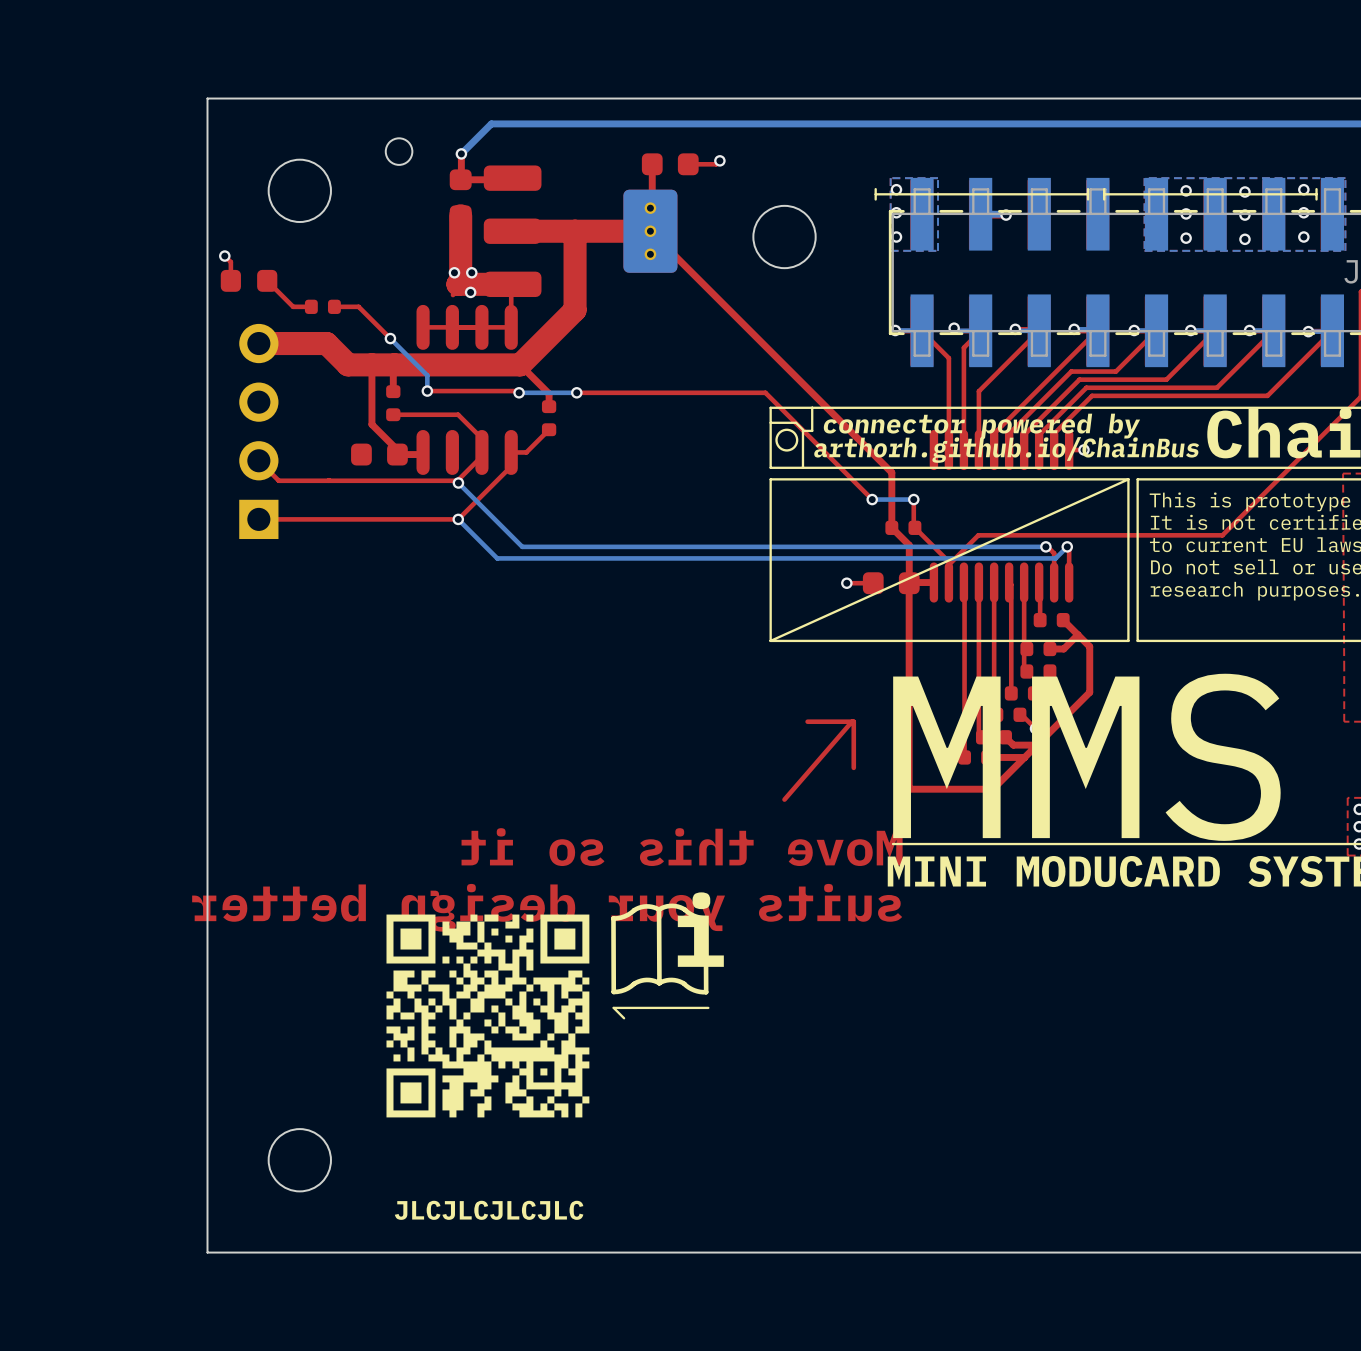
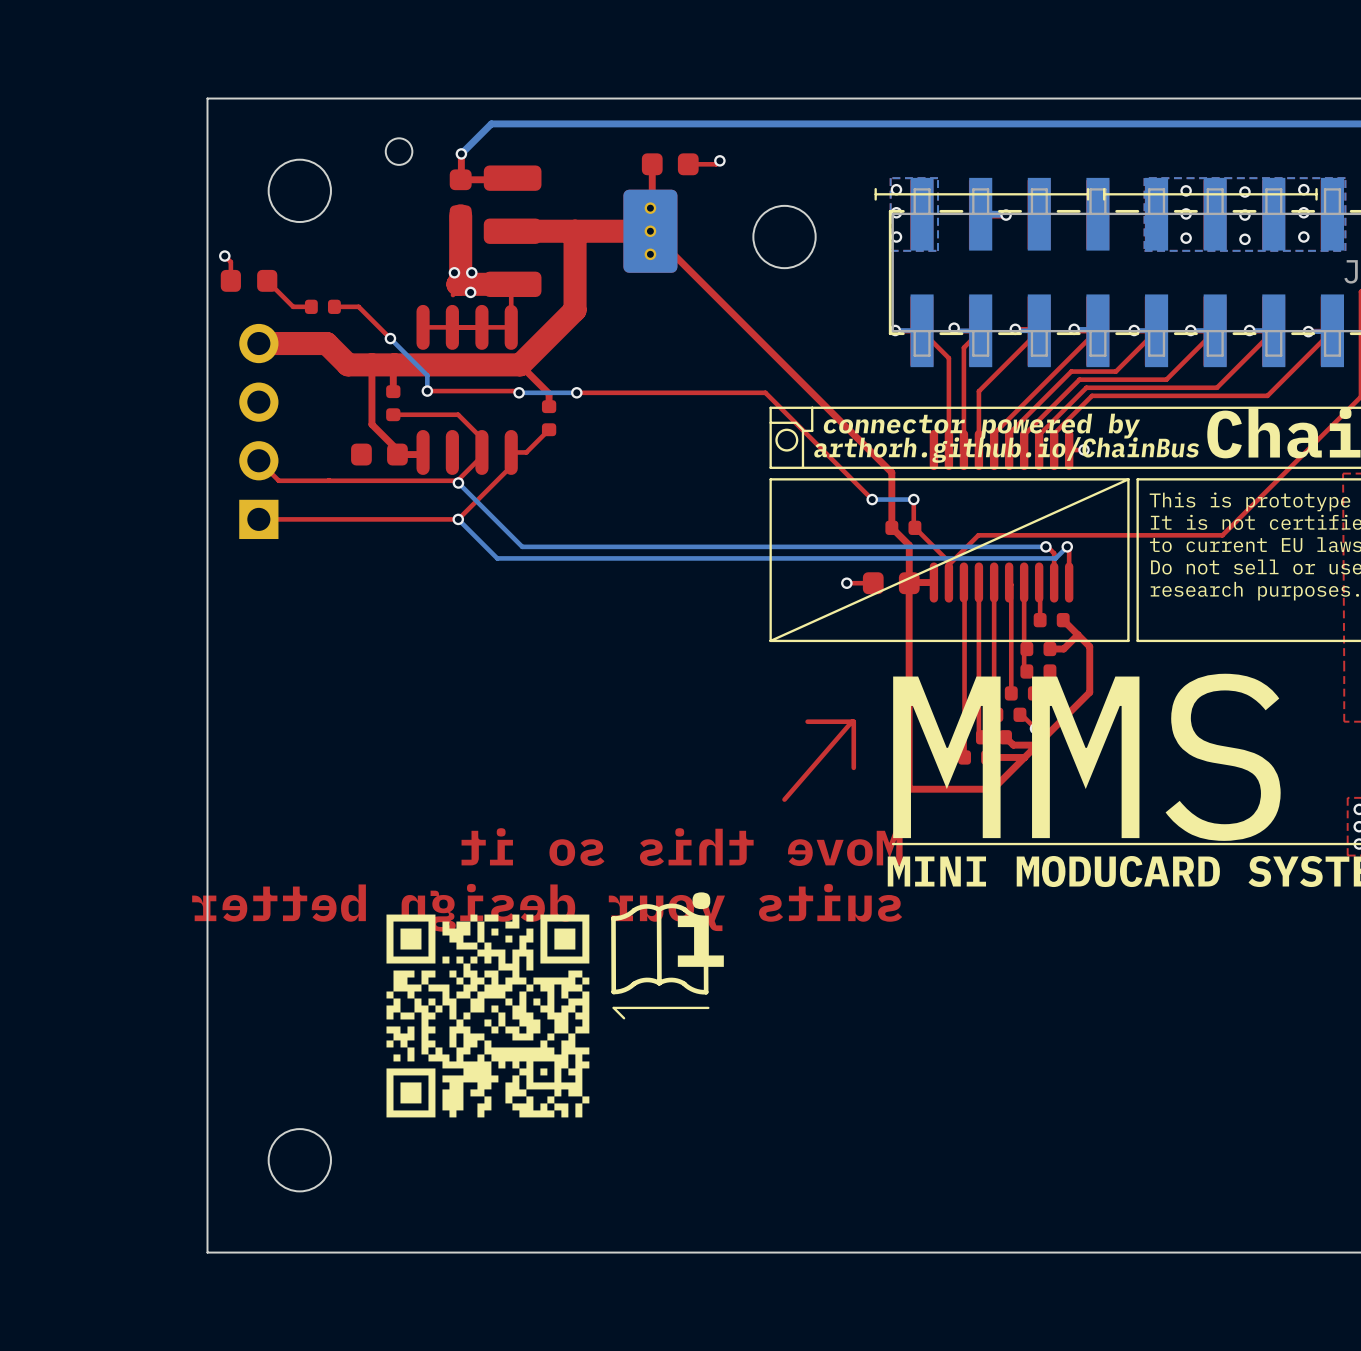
drawing: [394, 1200, 584, 1220] -> none

